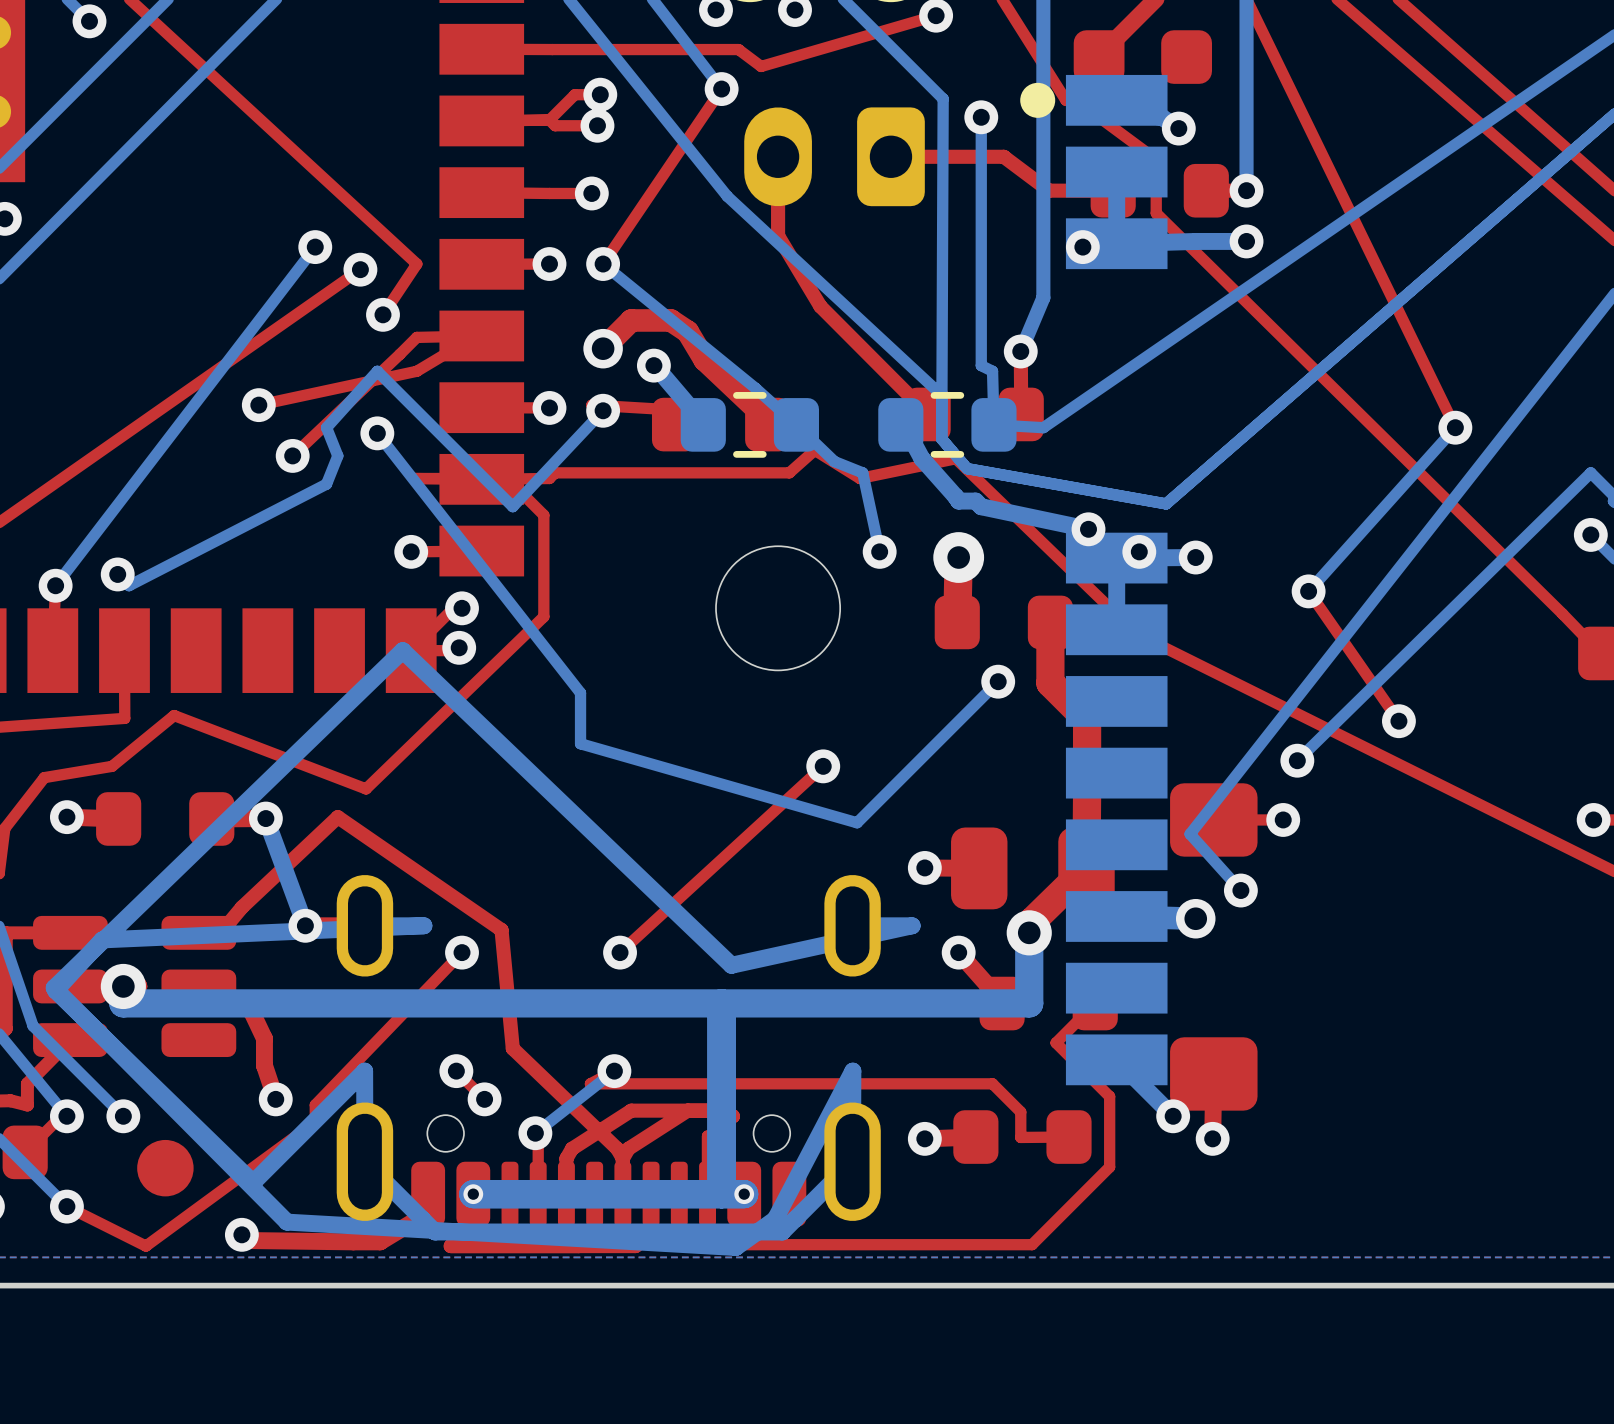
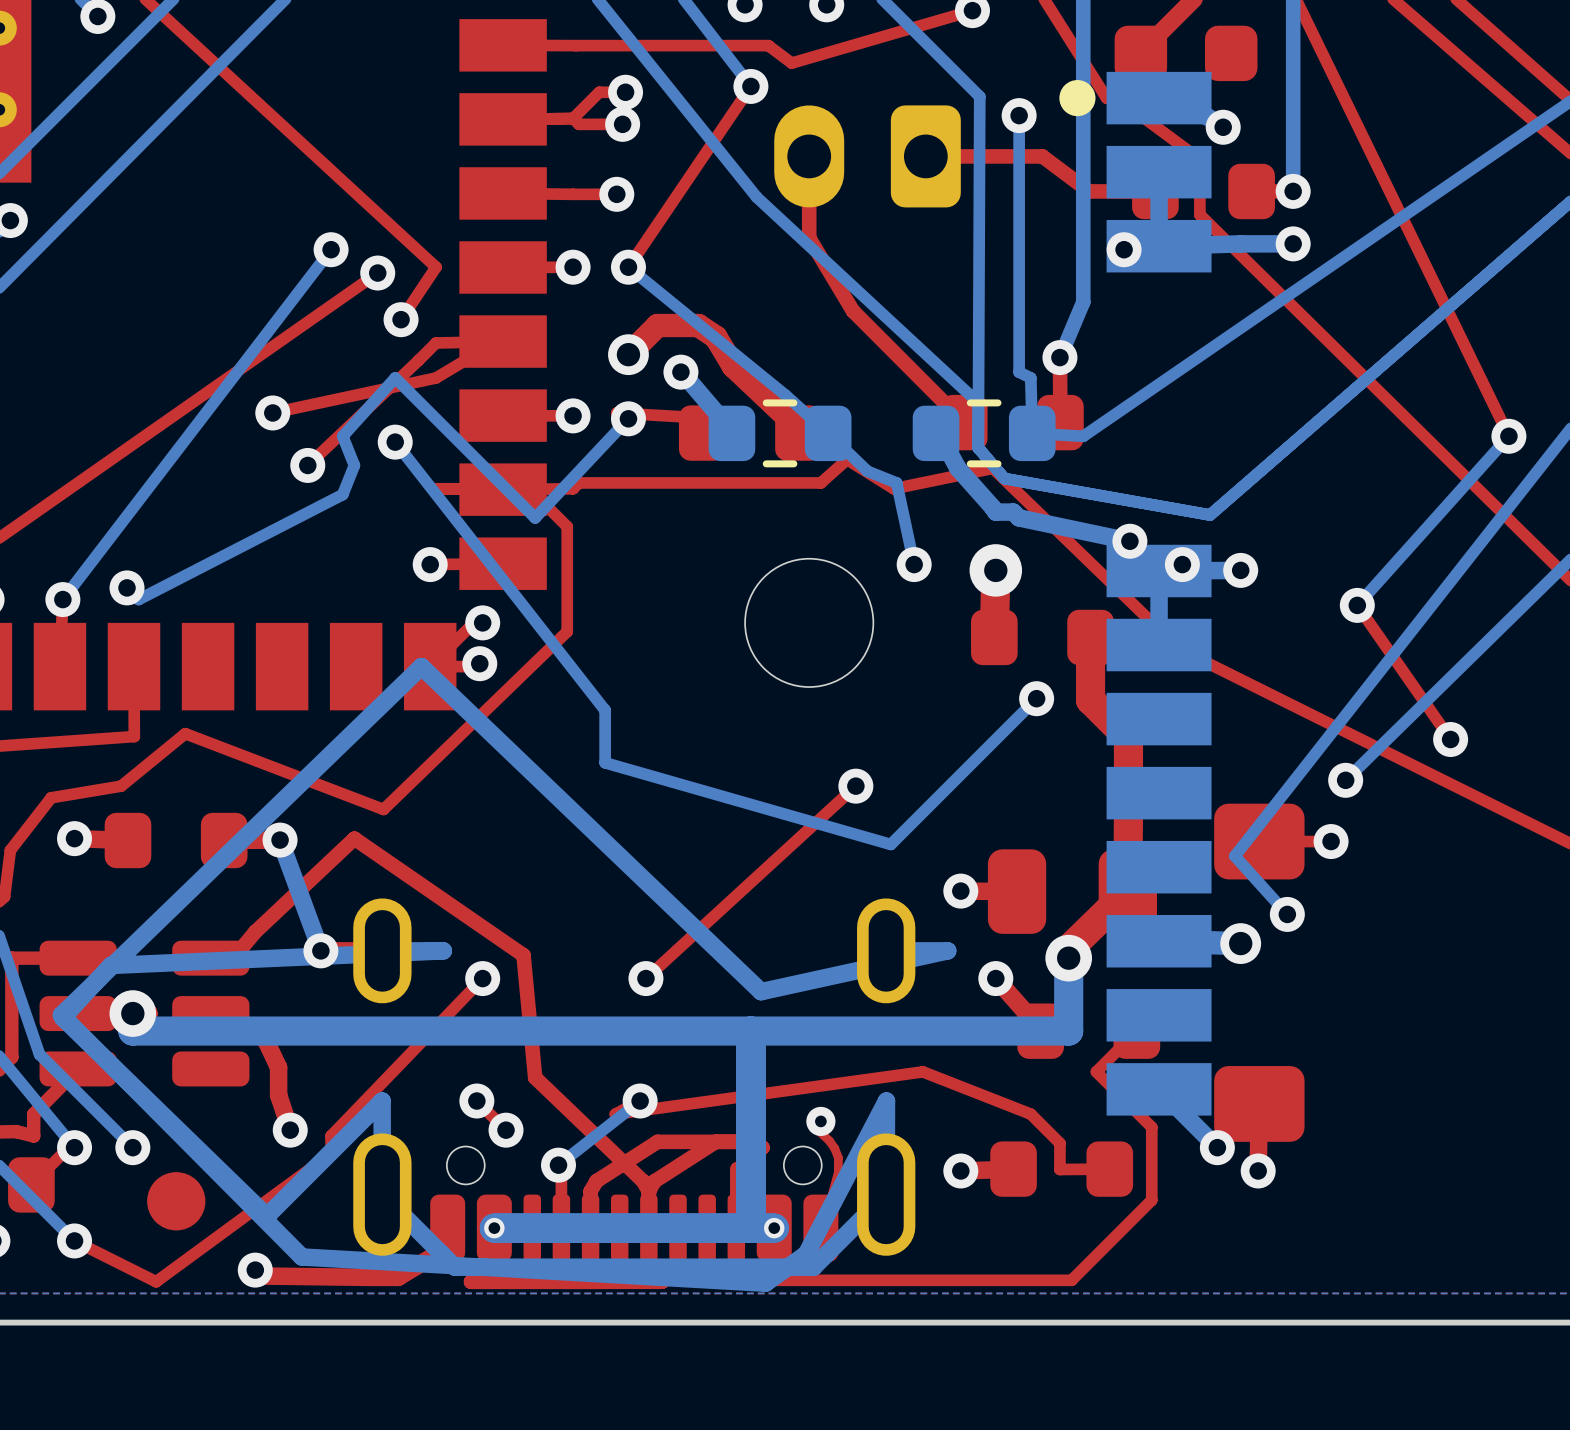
top track: (992, 1083) (590, 1083) -> (1030, 1114) (922, 1071) (615, 1114)
top track: none -> (820, 1121) (815, 1127) (829, 1141) (838, 1157) (838, 1172) (829, 1203)
via: none -> (820, 1121)

